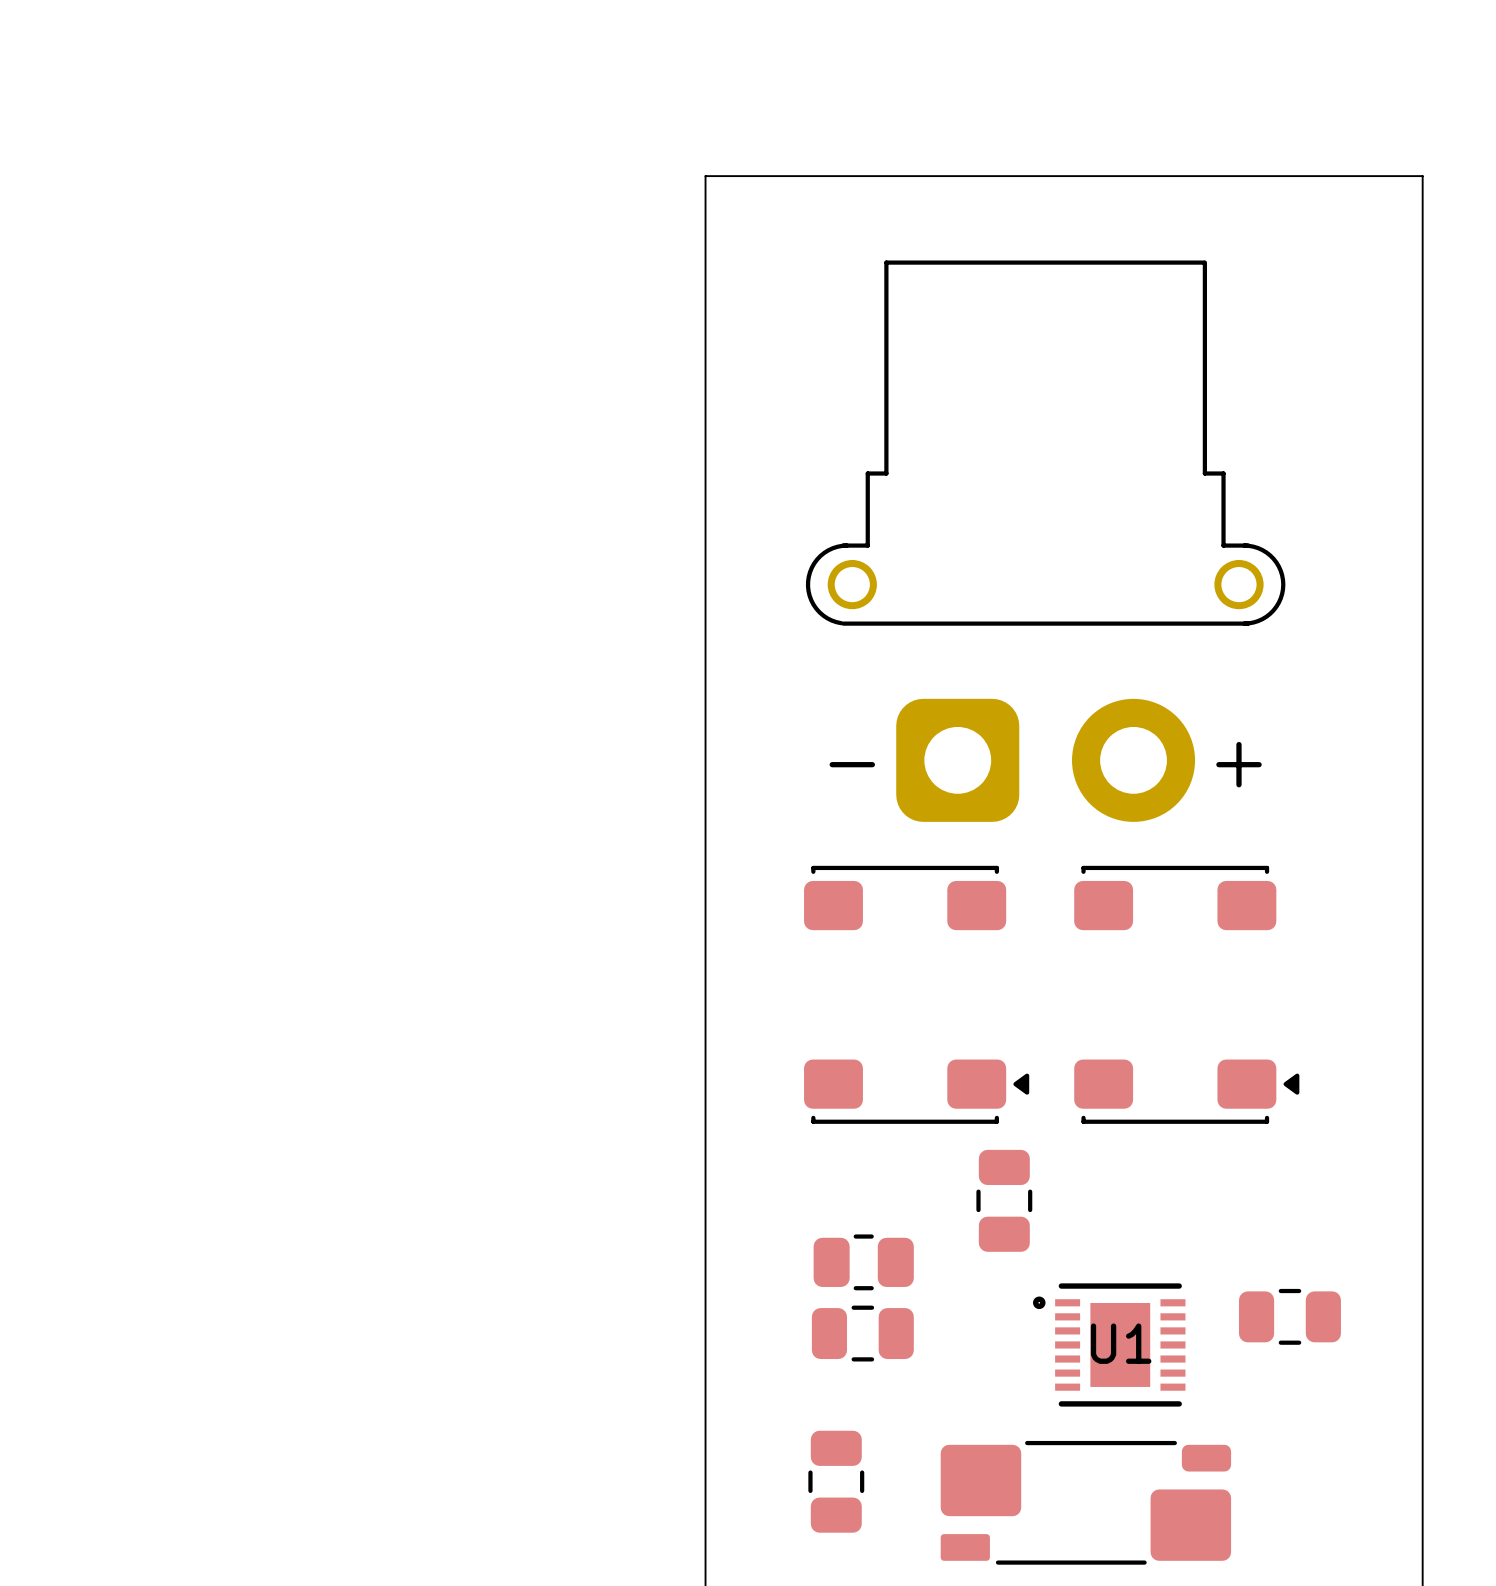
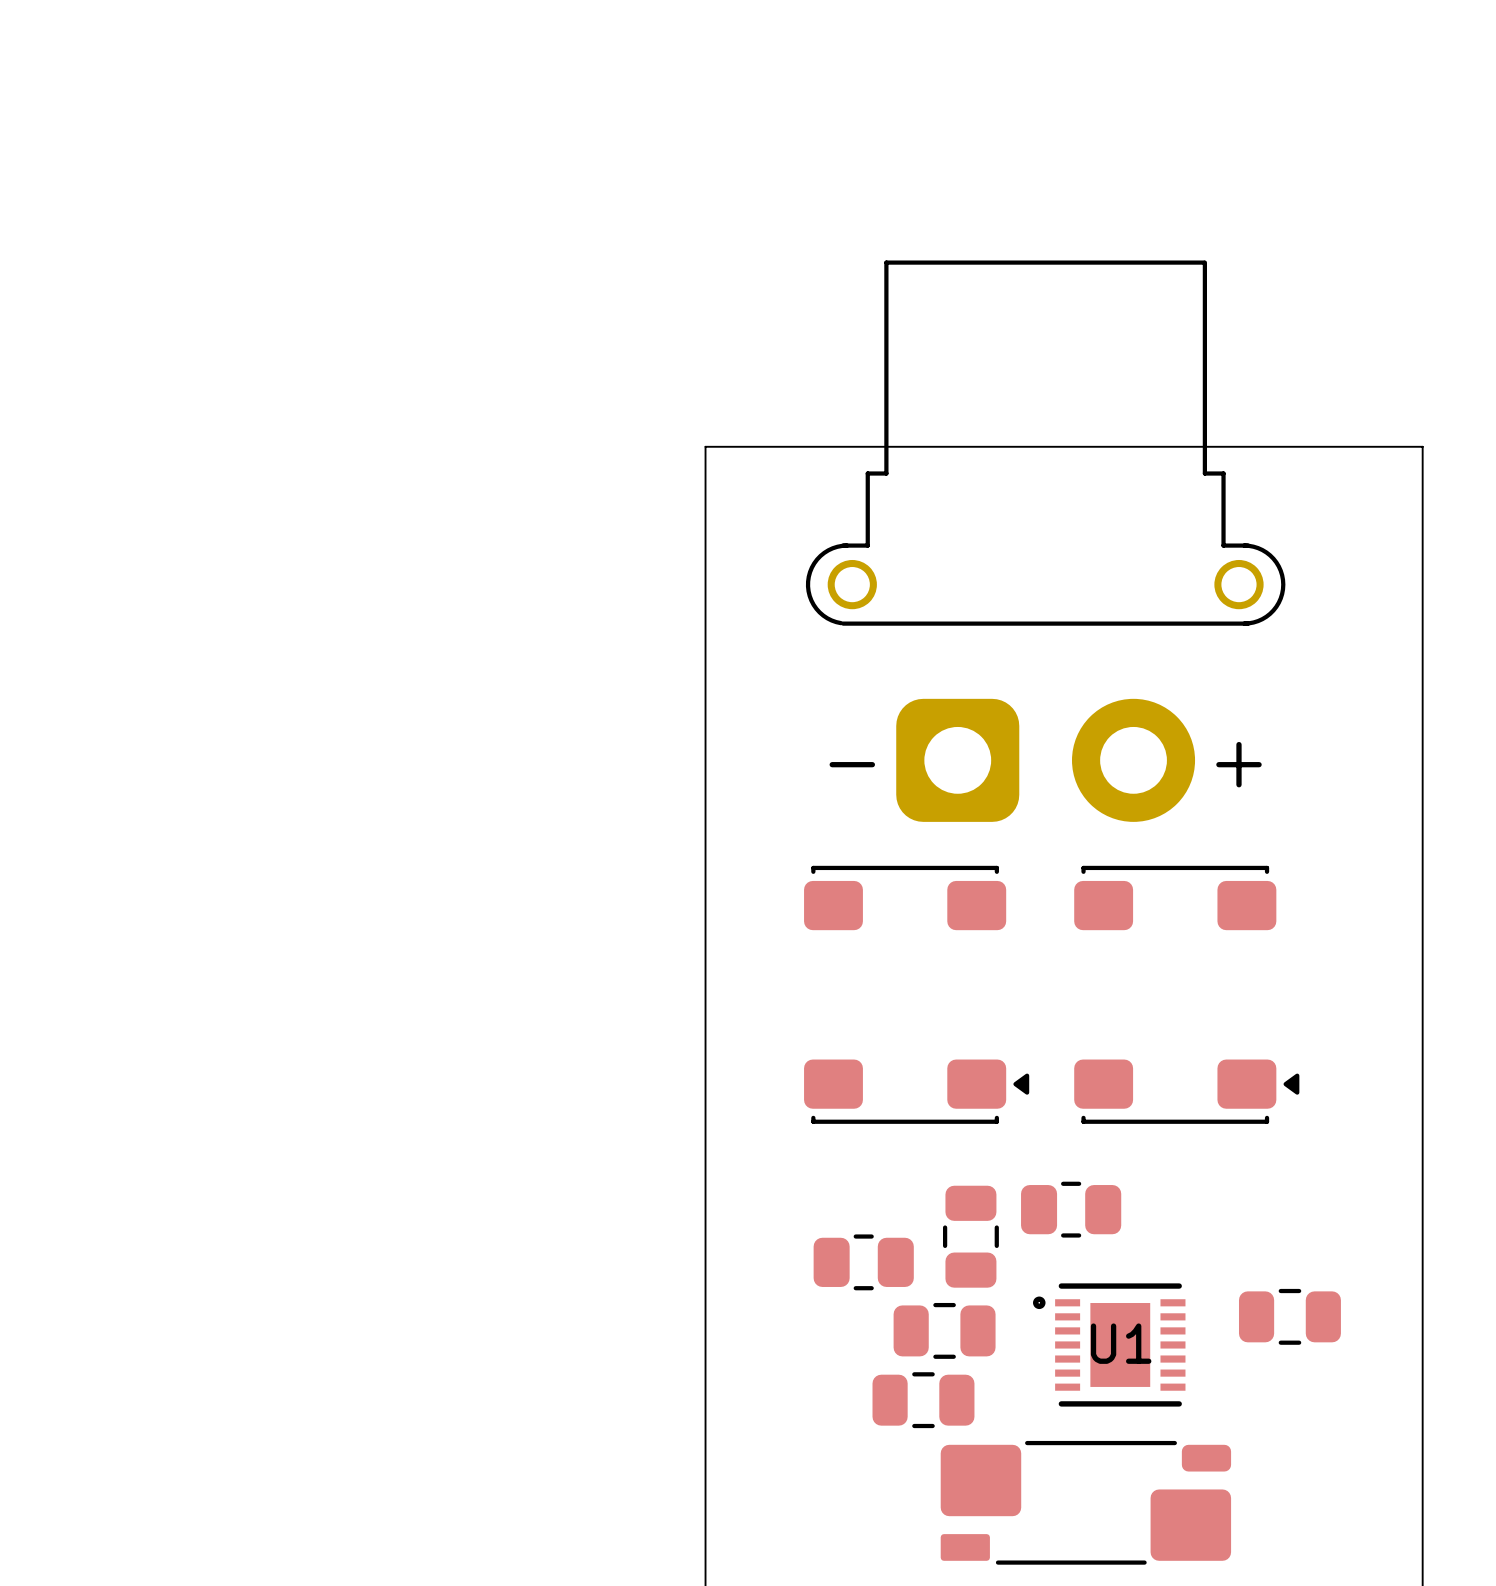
board edge: (705, 446) (705, 176) (1422, 176) (1422, 446) -> (705, 446) (1422, 446)
part position: (1004, 1200) -> (970, 1236)
part: none -> (1071, 1209)
part: none -> (944, 1330)
part: (862, 1333) -> none
part: none -> (923, 1400)
part: (836, 1481) -> none

